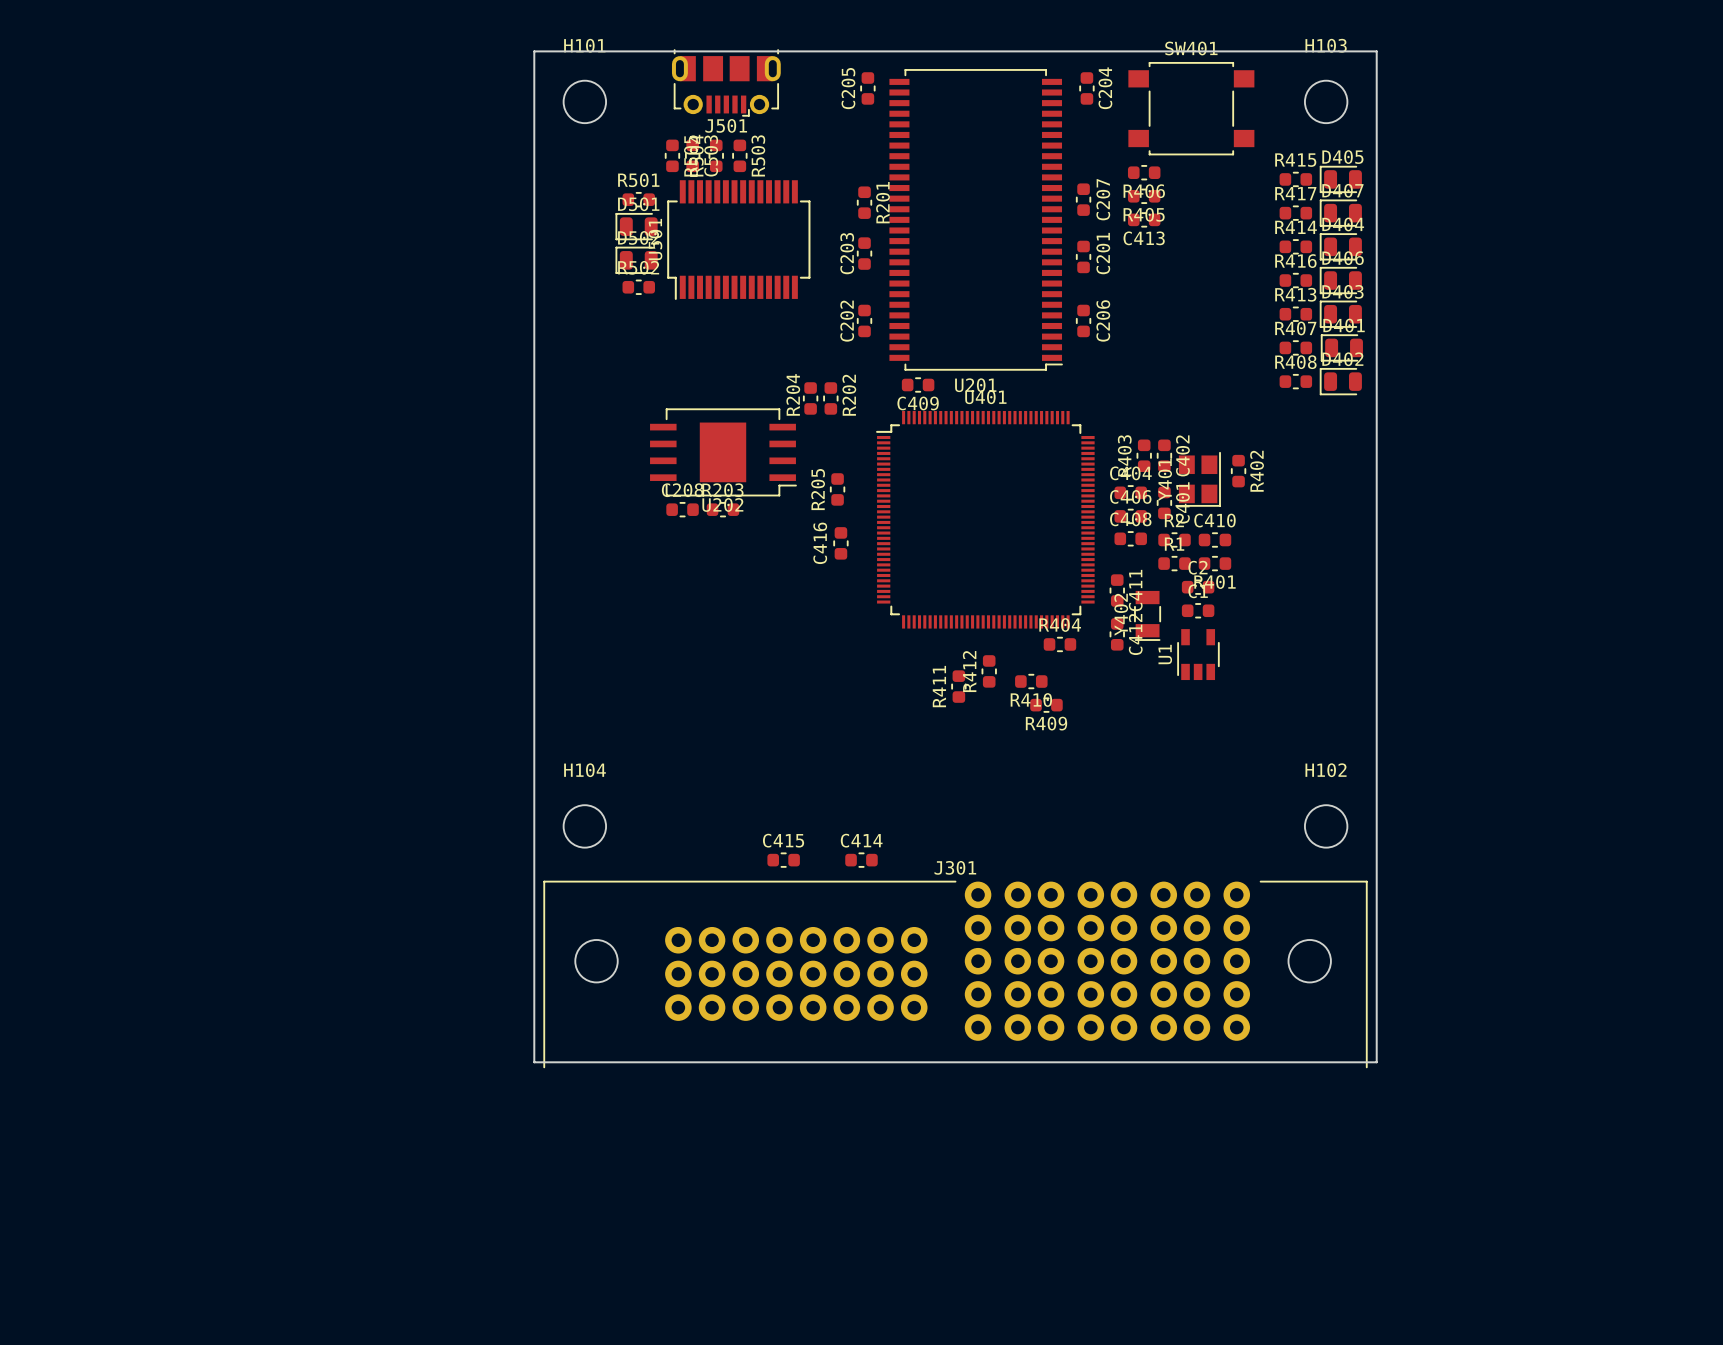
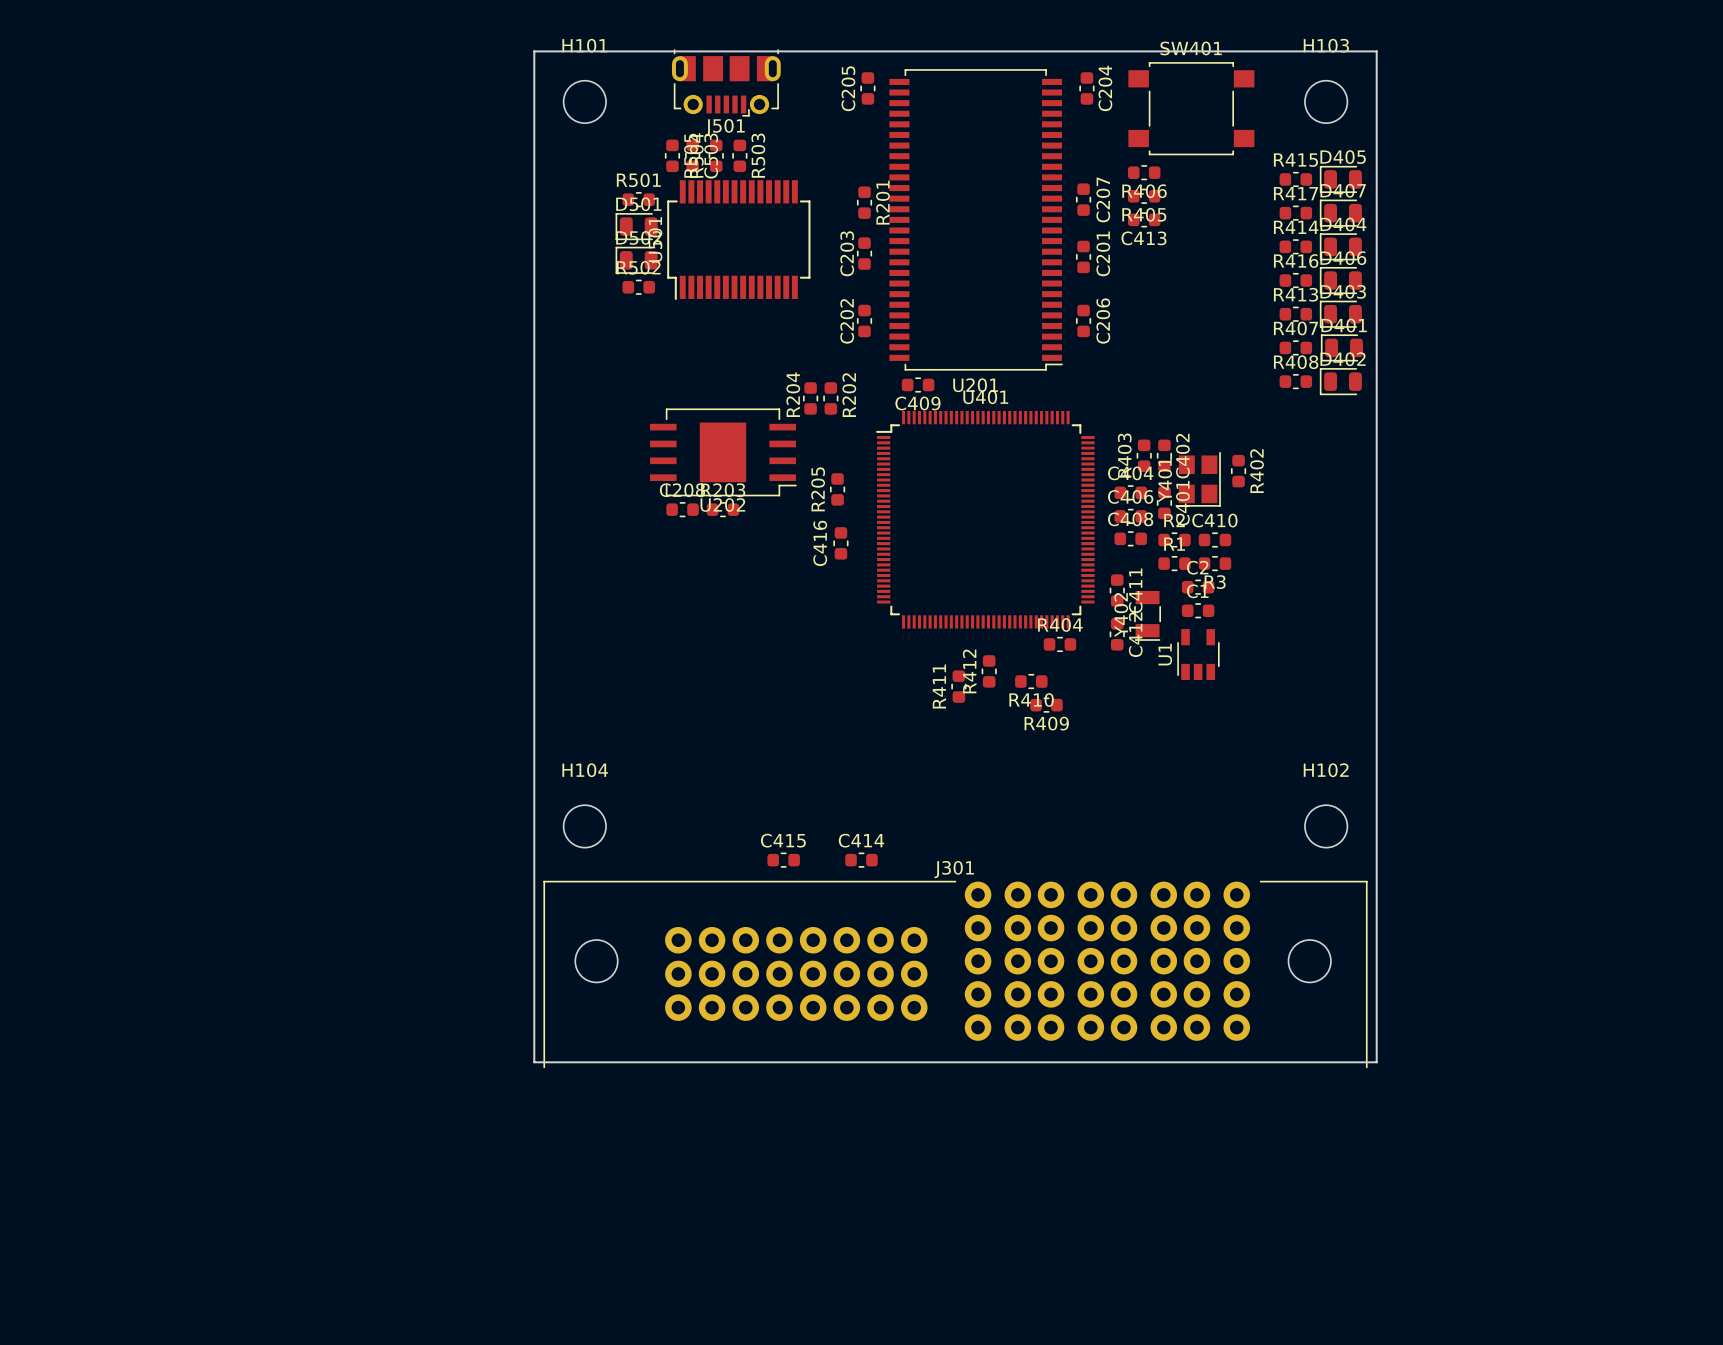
R401 name: R401 (1214, 582) -> R3 (1215, 582)

